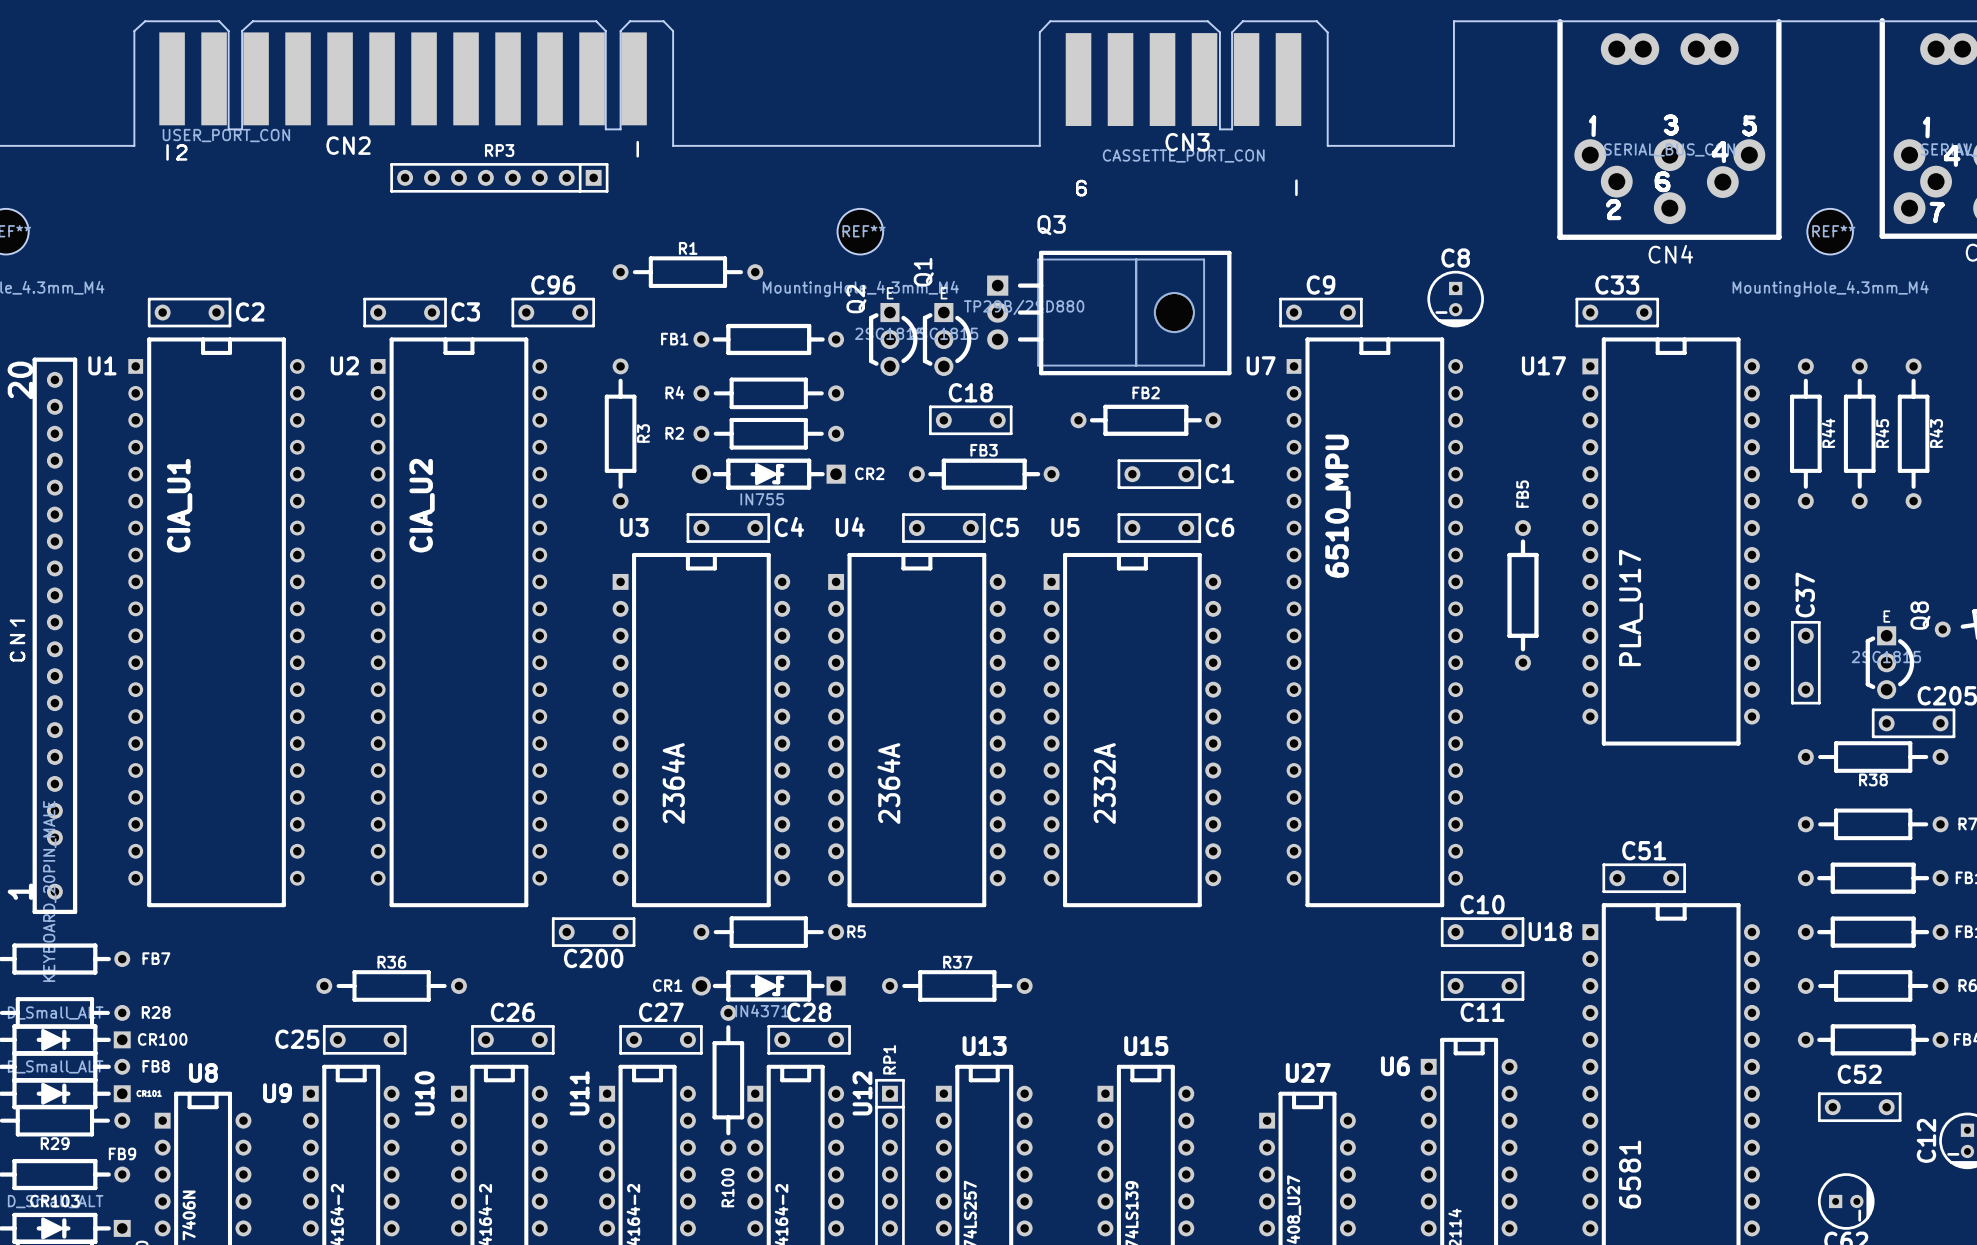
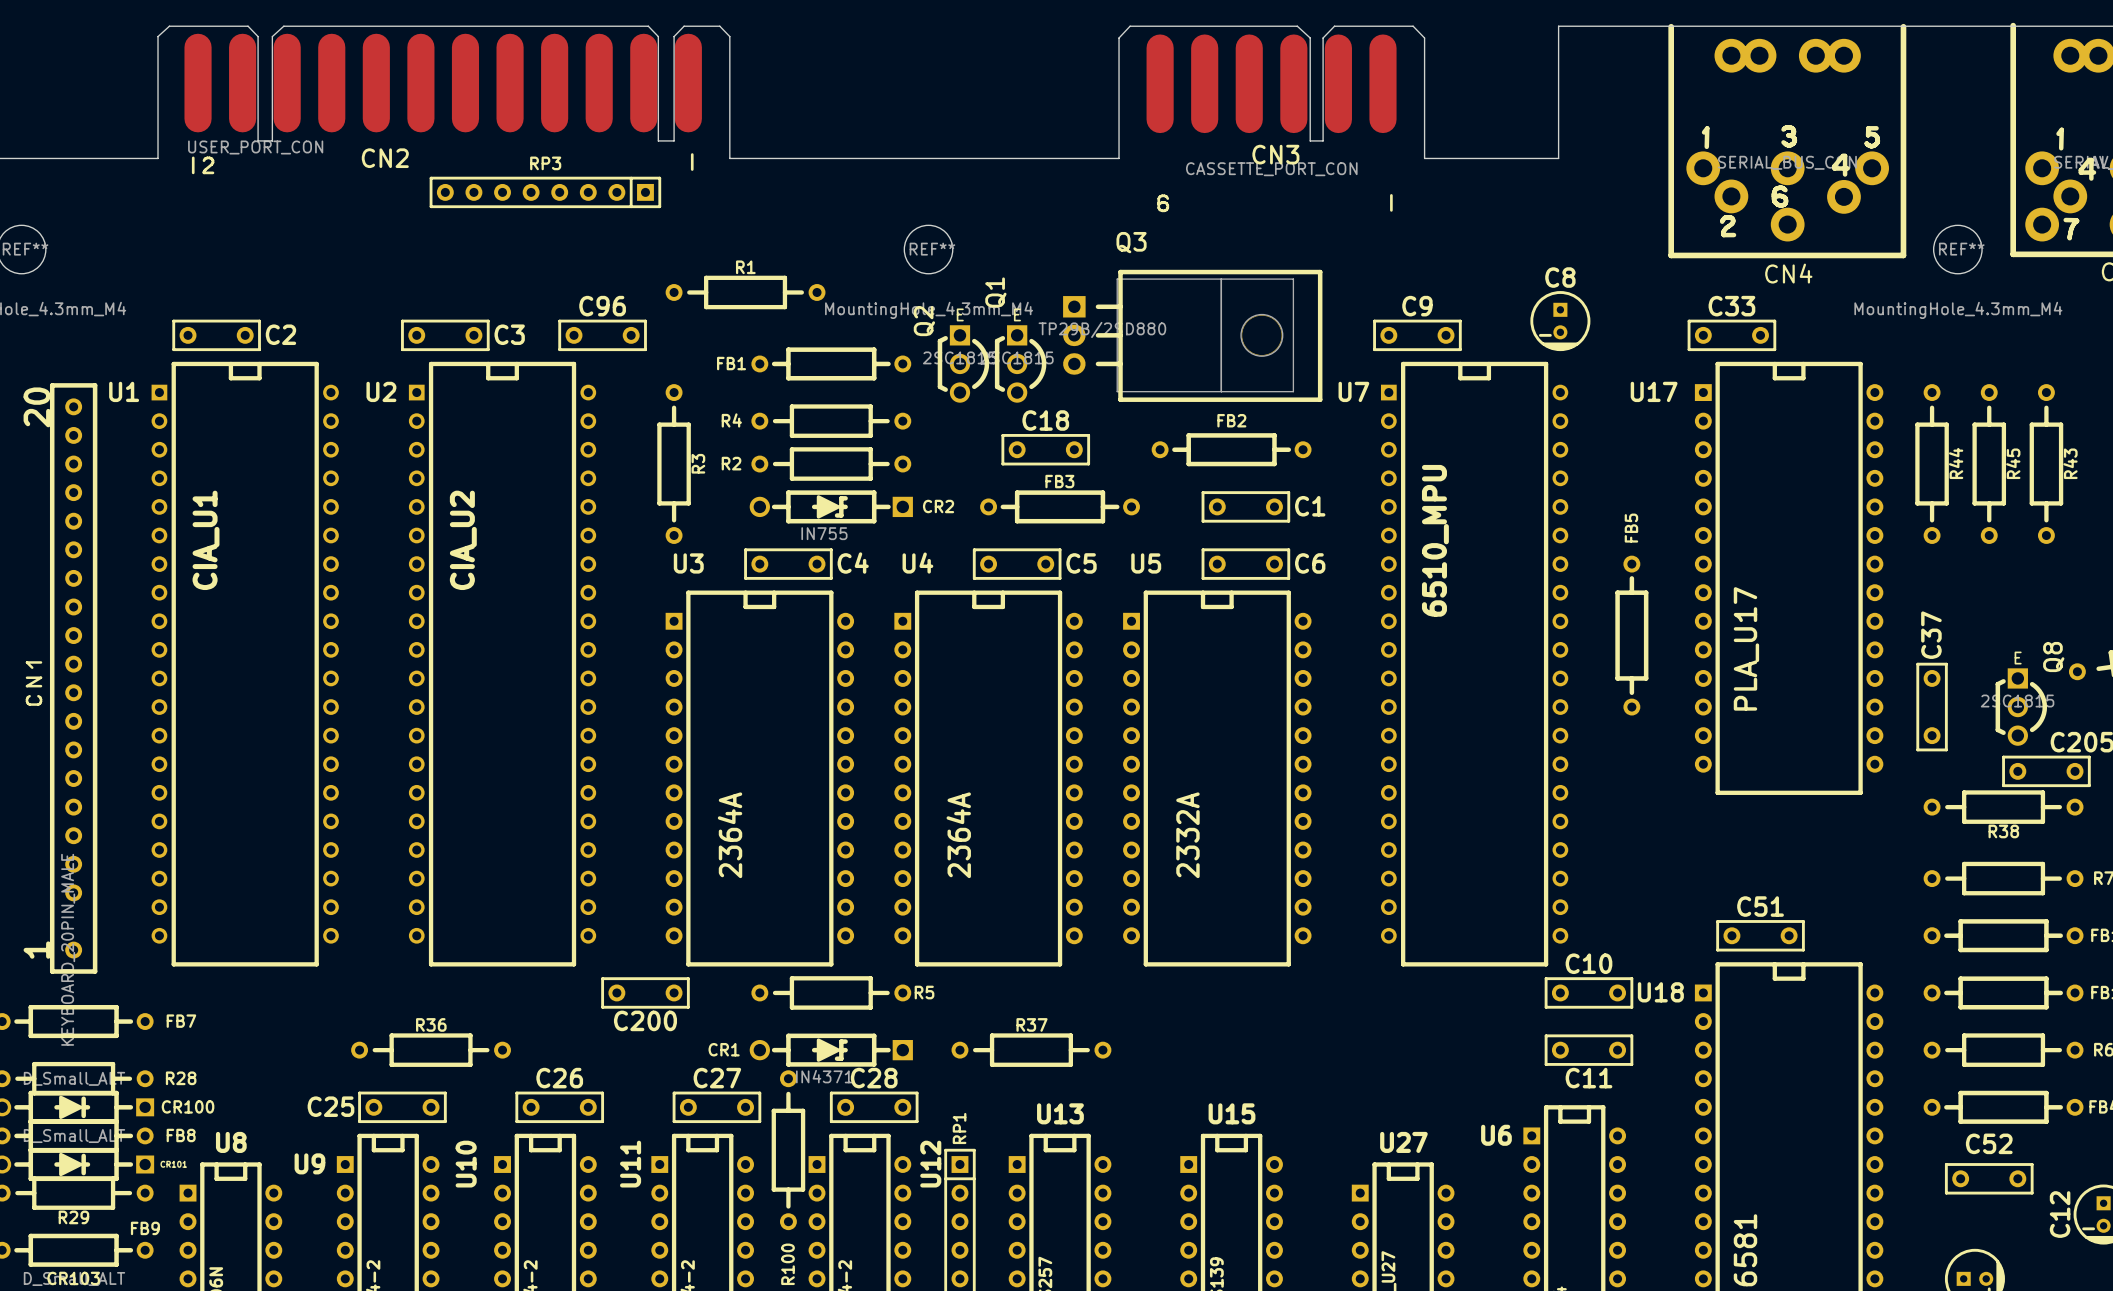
CN2 footprint: [159, 32, 647, 126] -> [184, 33, 702, 133]
CN3 footprint: [1065, 33, 1302, 126] -> [1146, 34, 1397, 134]

